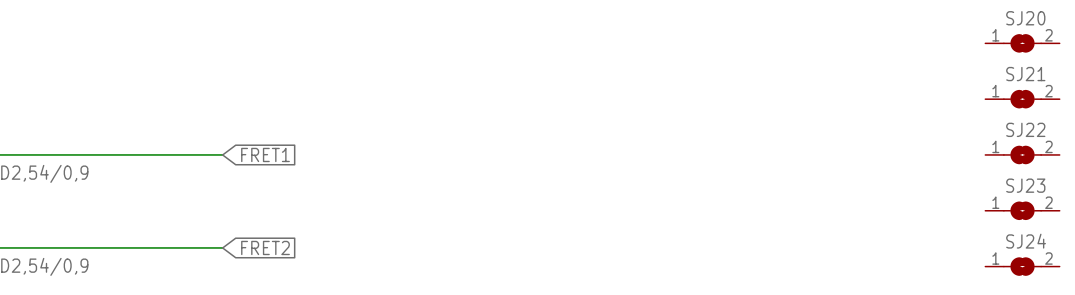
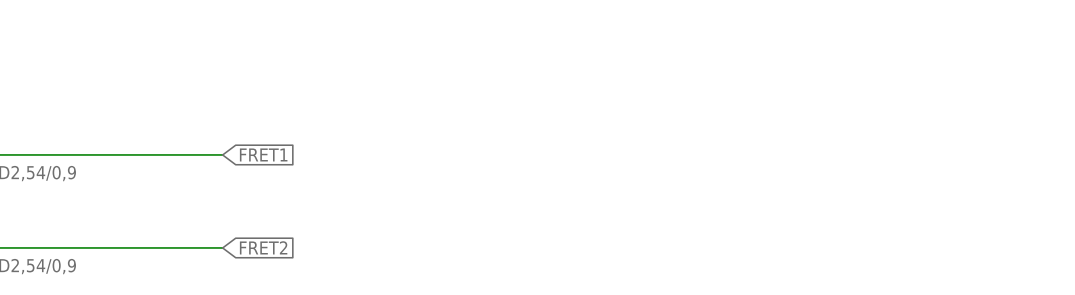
SJ20: (1022, 43) -> none
SJ21: (1022, 99) -> none
SJ22: (1022, 154) -> none
SJ23: (1022, 210) -> none
SJ24: (1022, 266) -> none

